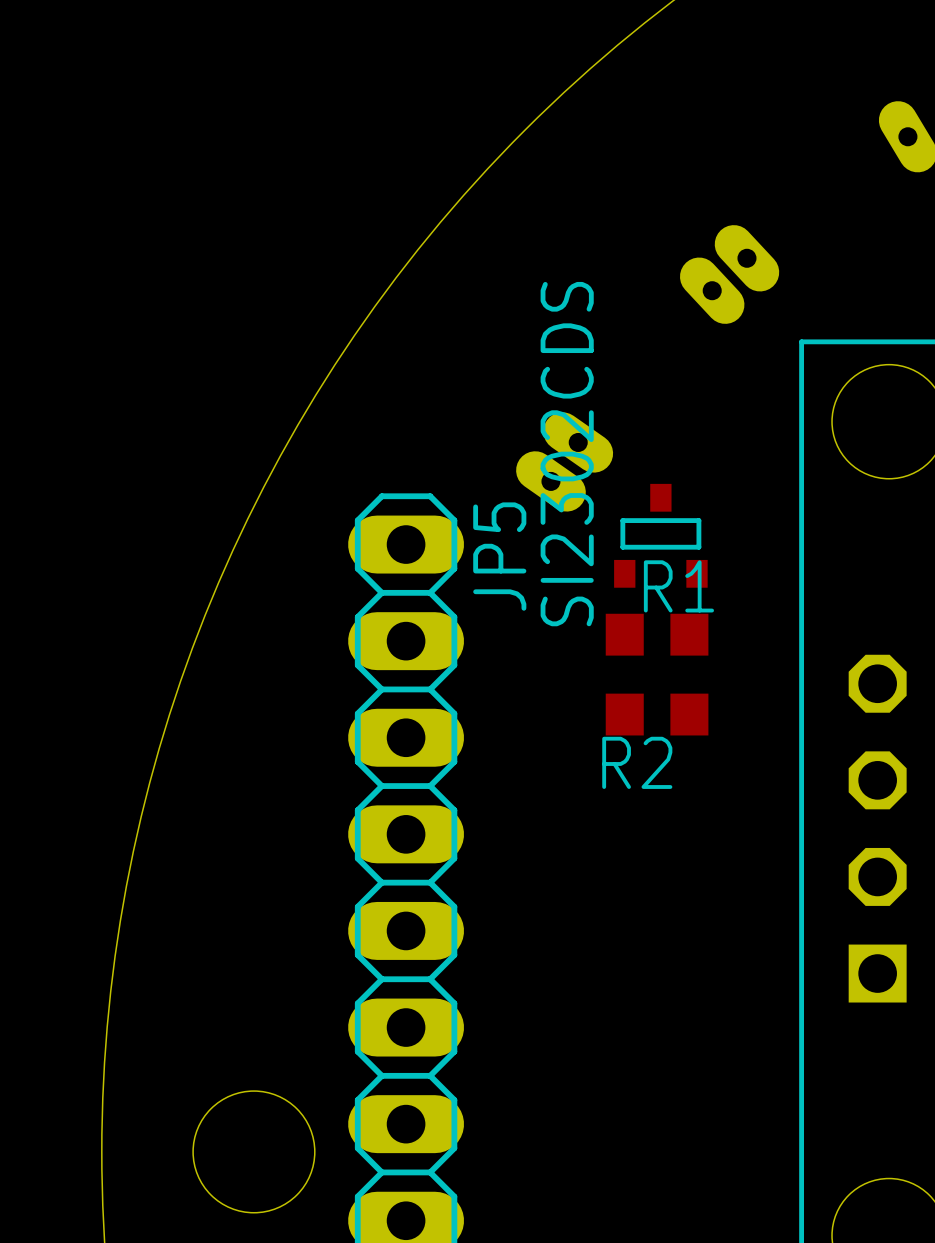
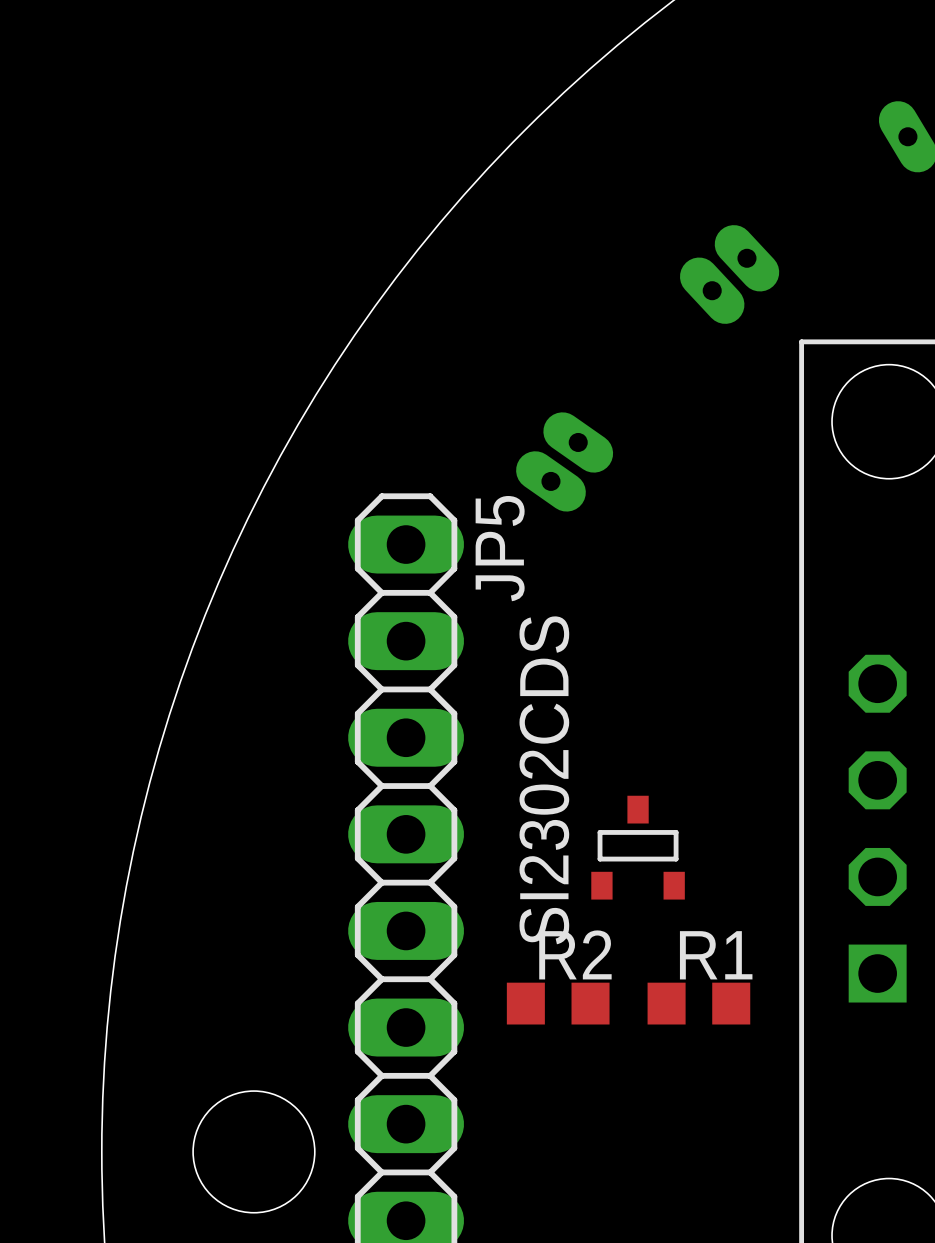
SI2302CDS position: (660, 535) -> (638, 847)
R1 position: (657, 634) -> (698, 1003)
R2 position: (657, 714) -> (558, 1003)
R2 name position: R2 (637, 762) -> R2 (575, 954)

